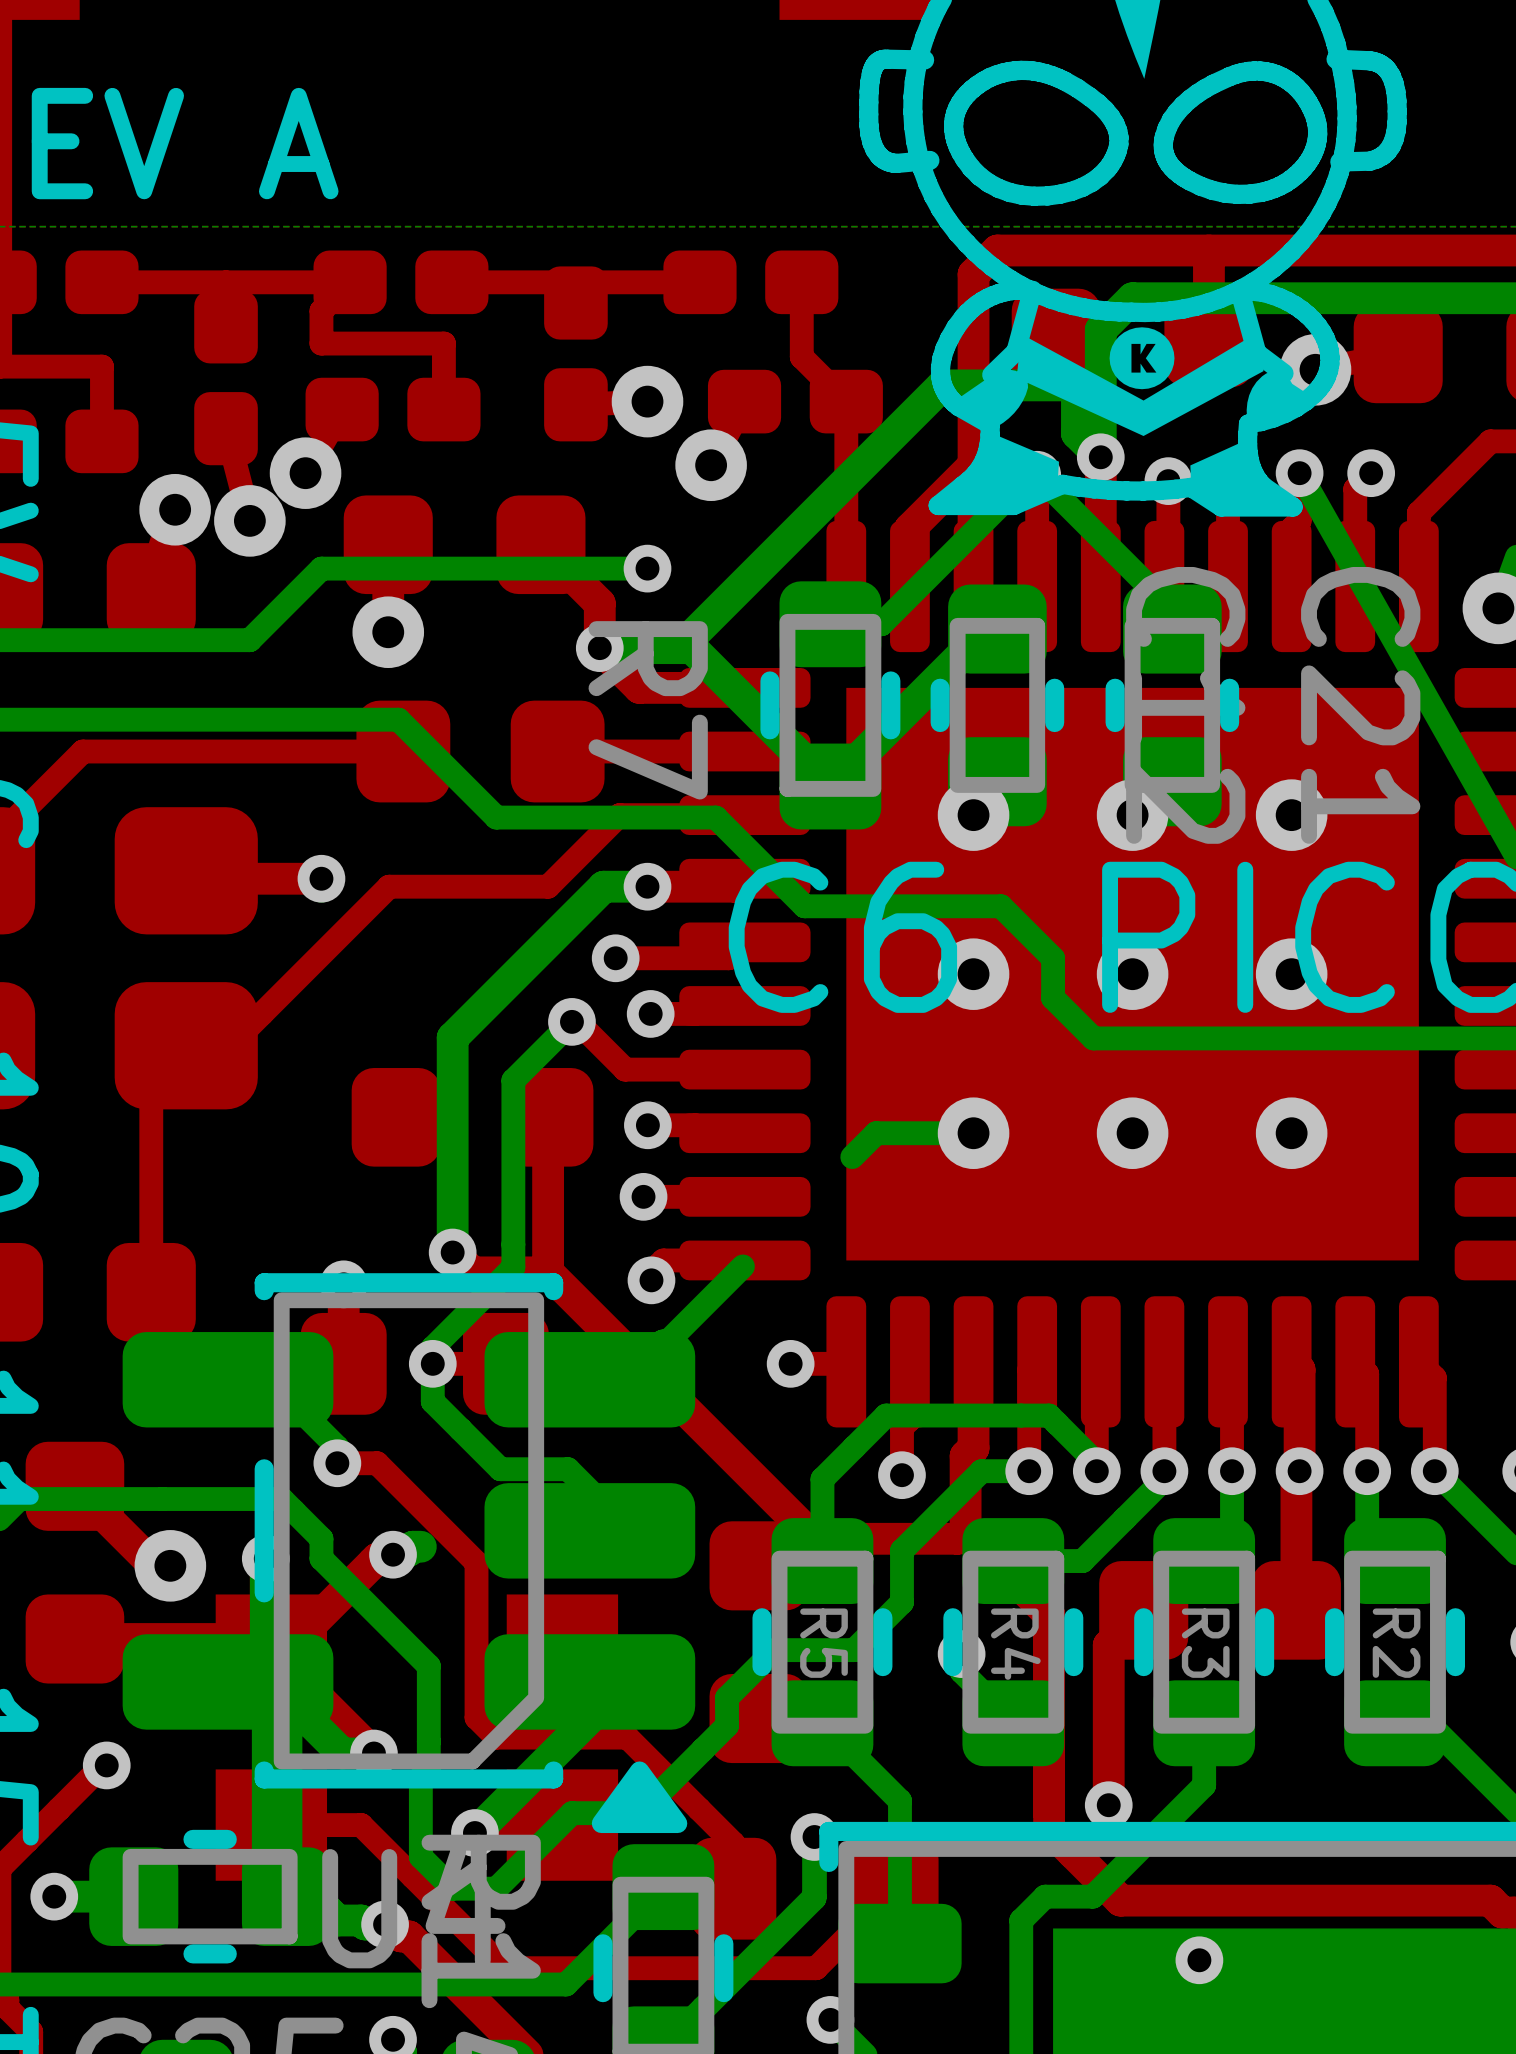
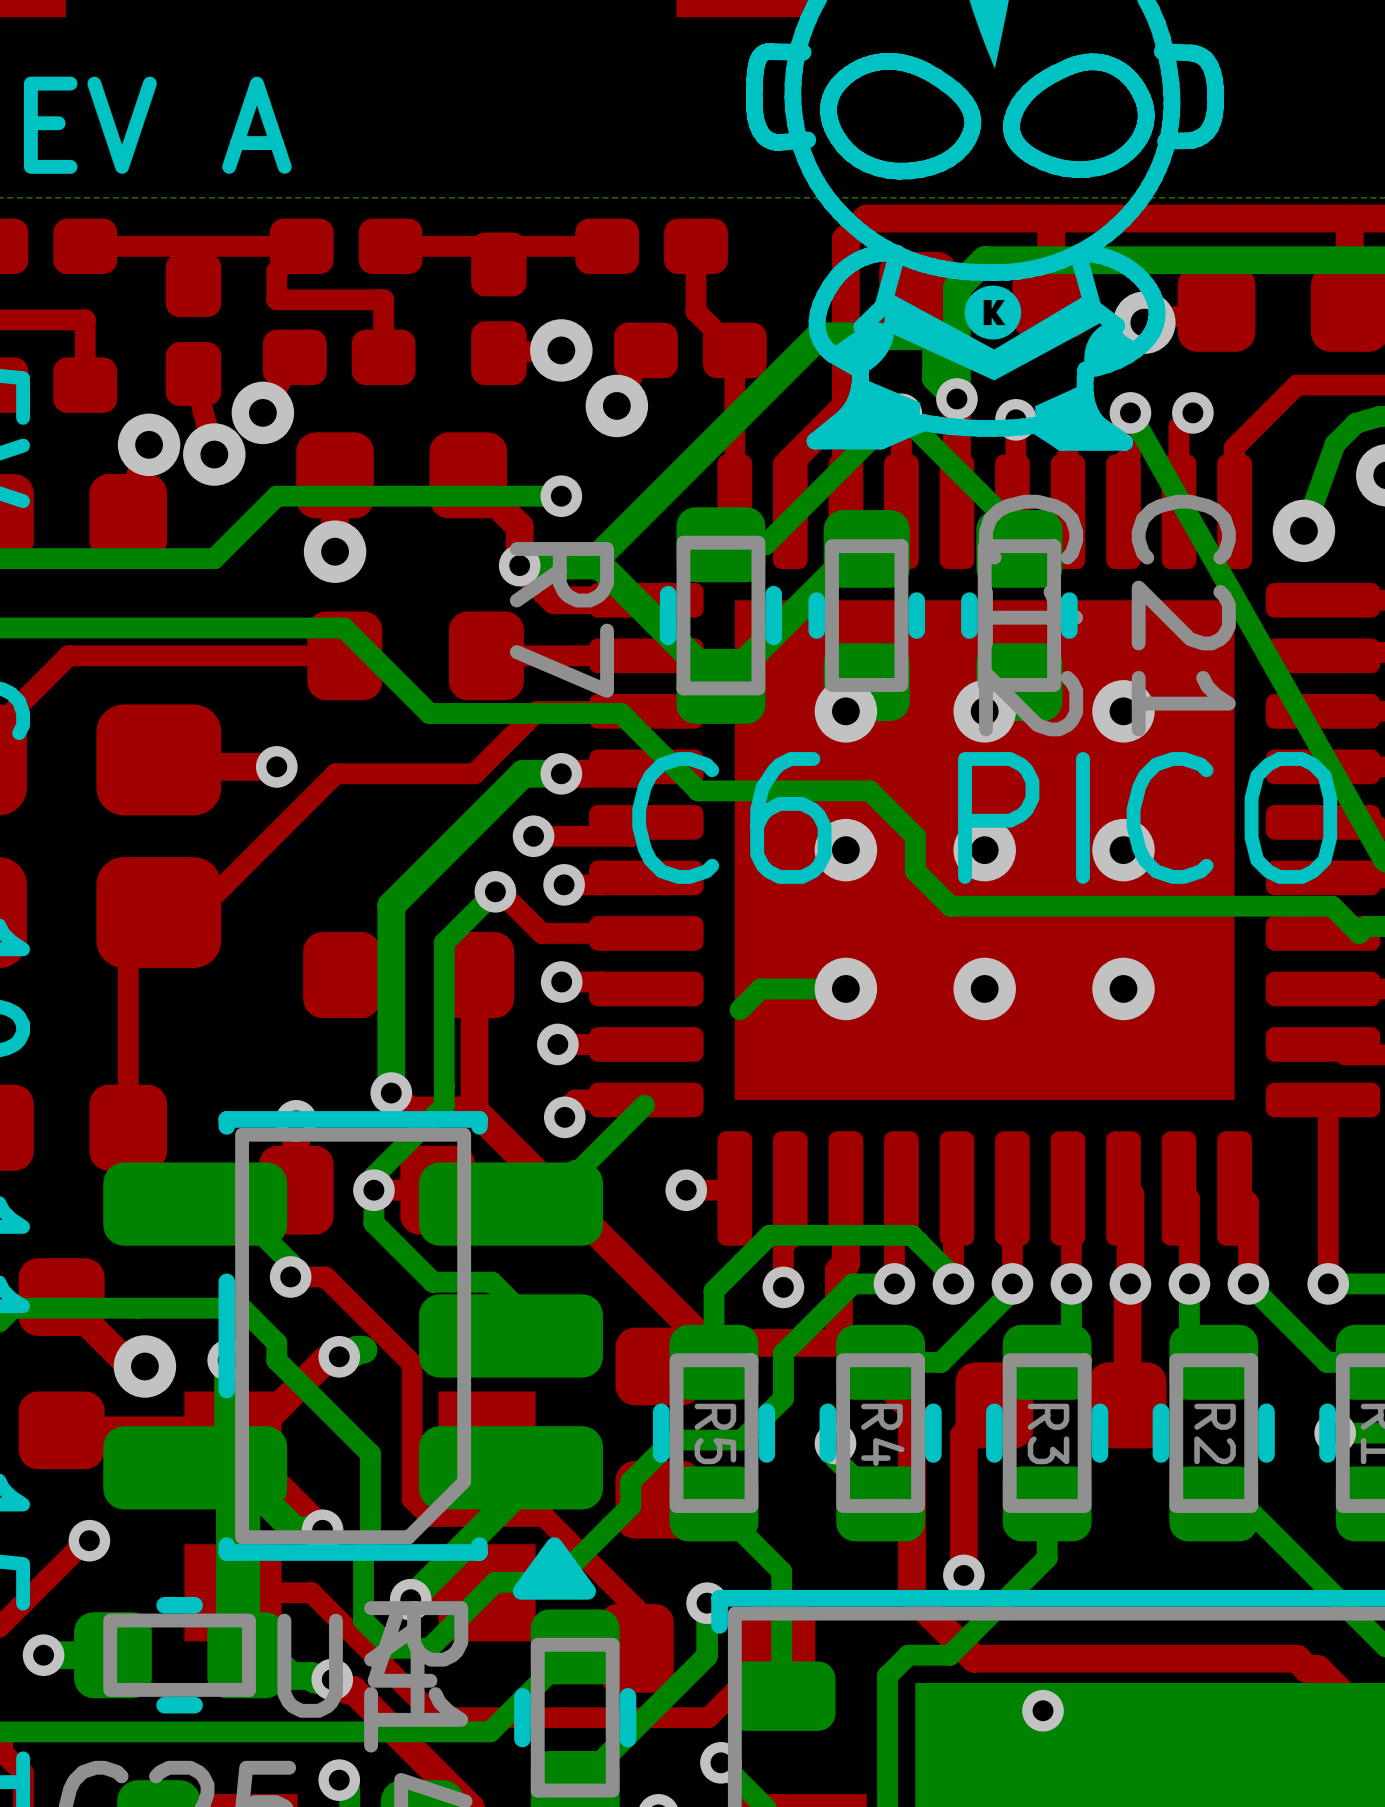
part footprint: [356, 700, 605, 803] -> [307, 611, 524, 701]

